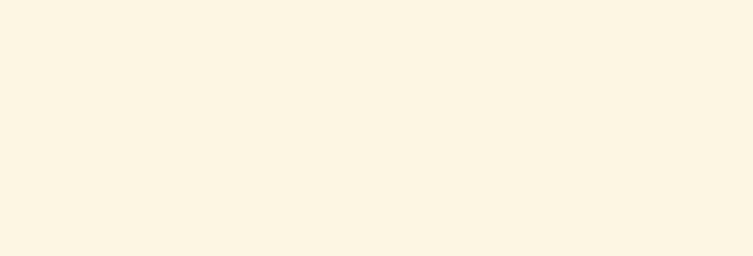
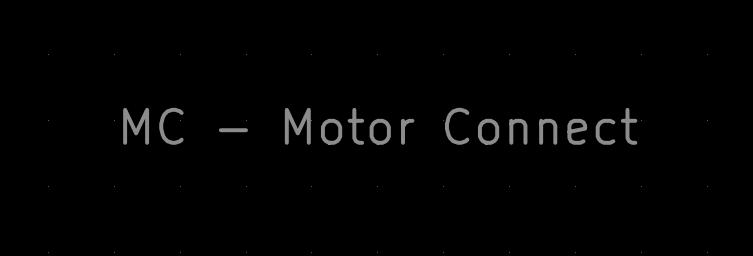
text: none -> MC - Motor Connect (380, 126)

